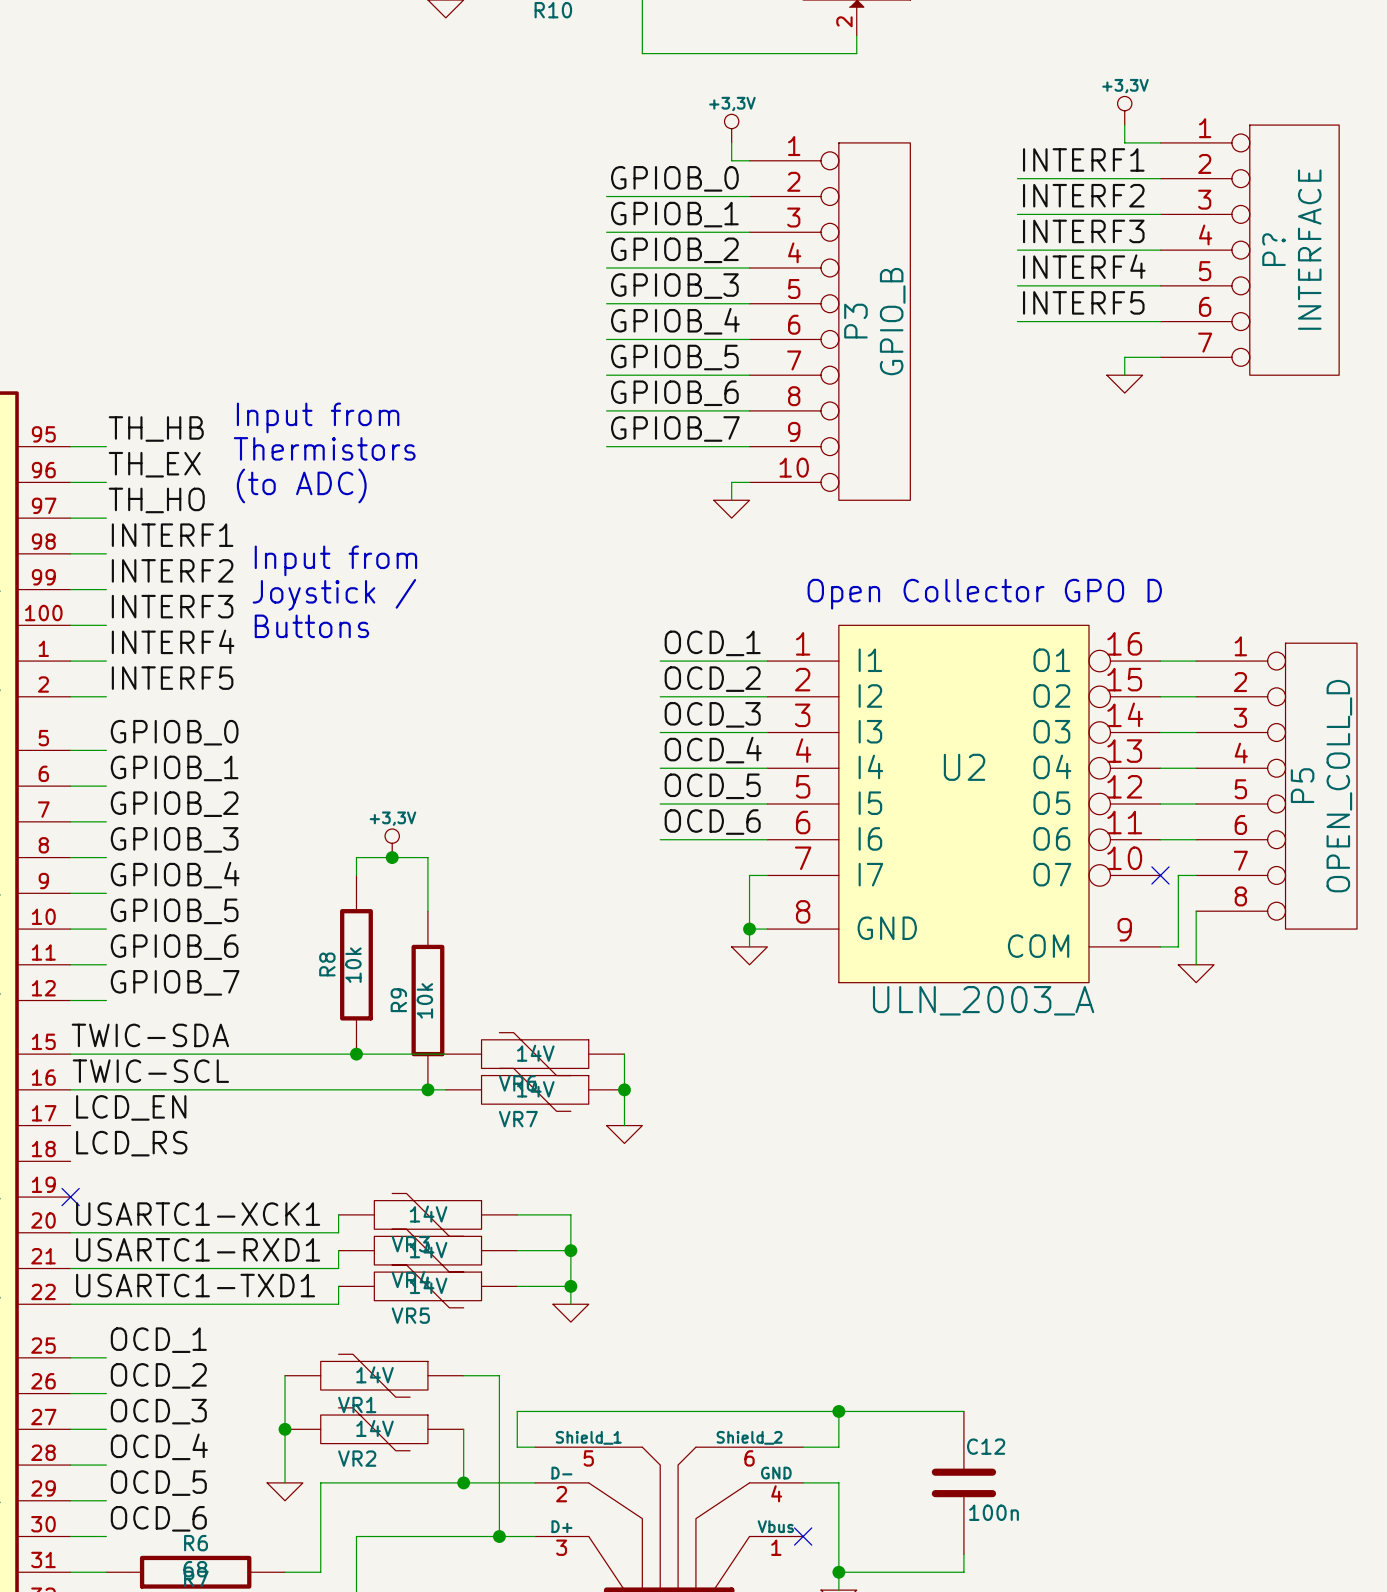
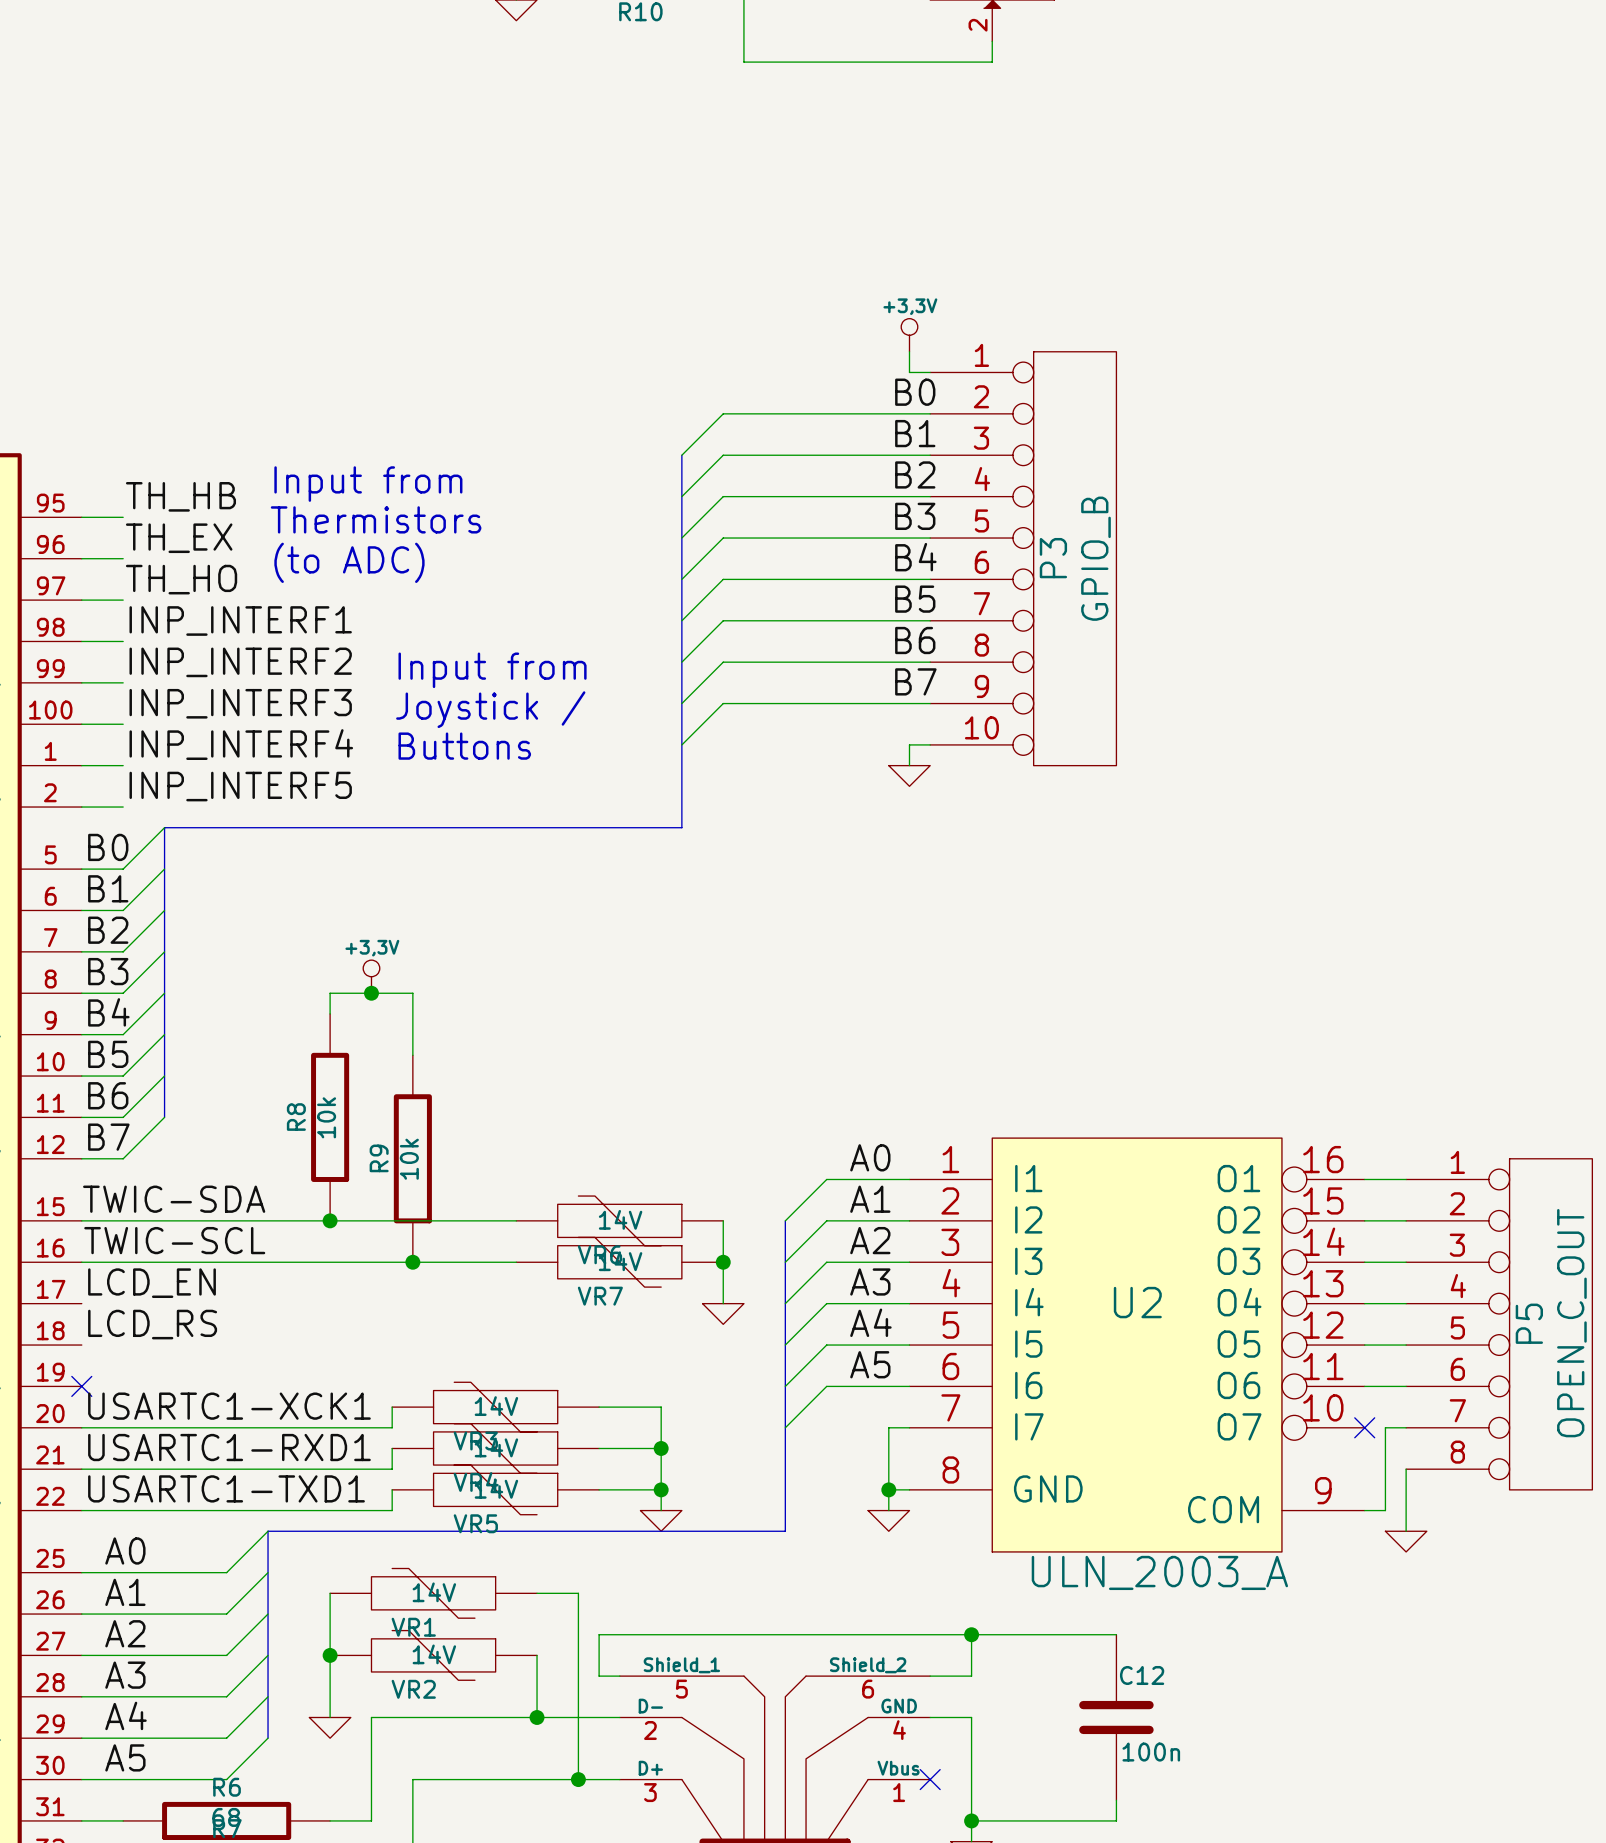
power symbol: +3,3V (1124, 110) -> none
wire: (1124, 125) (1124, 142) (1160, 142) -> none
power symbol position: +3,3V (731, 128) -> +3,3V (909, 335)
wire: (731, 142) (731, 160) (749, 160) -> (909, 351) (909, 372) (930, 372)
label: INTERF1 (1083, 159) -> none
label: GPIOB_0 (674, 178) -> none
wire: (1017, 178) (1160, 178) -> none
label: INTERF2 (1083, 195) -> none
wire: (606, 196) (749, 196) -> none
label: GPIOB_1 (674, 214) -> none
wire: (1017, 214) (1160, 214) -> none
label: INTERF3 (1083, 231) -> none
wire: (606, 232) (749, 232) -> none
label: GPIOB_2 (674, 250) -> none
wire: (1017, 250) (1160, 250) -> none
P?: INTERFACE (1249, 250) -> none
label: INTERF4 (1084, 266) -> none
wire: (606, 268) (749, 268) -> none
wire: (1017, 285) (1160, 285) -> none
label: GPIOB_3 (674, 286) -> none
label: INTERF5 (1083, 302) -> none
wire: (606, 303) (749, 303) -> none
label: GPIOB_4 (675, 321) -> none
P3 position: (829, 321) -> (1023, 558)
wire: (1017, 321) (1160, 321) -> none
label: none -> B0 (915, 392)
wire: (606, 339) (749, 339) -> none
label: GPIOB_5 (674, 357) -> none
wire: none -> (930, 413) (723, 413) (681, 455)
wire: (1160, 357) (1124, 357) (1124, 375) -> none
label: none -> B1 (915, 433)
wire: (606, 375) (749, 375) -> none
power symbol: (1124, 384) -> none
bus: none -> (681, 455) (681, 827) (164, 827) (164, 1117)
label: GPIOB_6 (674, 393) -> none
wire: none -> (930, 455) (723, 455) (681, 496)
wire: (606, 410) (749, 410) -> none
label: none -> B2 (915, 474)
label: GPIOB_7 (675, 428) -> none
wire: none -> (930, 496) (723, 496) (681, 538)
label: none -> B3 (915, 516)
wire: (606, 446) (749, 446) -> none
wire: none -> (930, 538) (723, 538) (681, 579)
label: none -> B4 (915, 557)
wire: (749, 482) (731, 482) (731, 500) -> (930, 744) (909, 744) (909, 765)
wire: none -> (930, 579) (723, 579) (681, 620)
power symbol: (731, 509) -> none
label: none -> B5 (915, 599)
label: INTERF1 (172, 535) -> INP_INTERF1 (240, 620)
wire: none -> (930, 620) (723, 620) (681, 662)
label: none -> B6 (915, 640)
text position: Input from (335, 560) -> Input from (492, 670)
label: INTERF2 (172, 570) -> INP_INTERF2 (240, 662)
wire: none -> (930, 662) (723, 662) (681, 703)
label: none -> B7 (915, 681)
text position: Joystick / (334, 594) -> Joystick / (490, 709)
text: Open Collector GPO D (984, 594) -> none
label: INTERF3 (172, 606) -> INP_INTERF3 (240, 703)
wire: none -> (930, 703) (723, 703) (681, 744)
text position: Buttons (311, 626) -> Buttons (464, 746)
label: INTERF4 (173, 641) -> INP_INTERF4 (241, 744)
label: OCD_1 (712, 643) -> none
wire: (660, 661) (767, 661) -> none
wire: (1160, 661) (1196, 661) -> none
power symbol: none -> (909, 775)
label: INTERF5 (172, 678) -> INP_INTERF5 (240, 786)
label: OCD_2 (712, 679) -> none
wire: (660, 696) (767, 696) -> none
wire: (1160, 696) (1196, 696) -> (1364, 1179) (1406, 1179)
wire: none -> (164, 827) (123, 869)
label: OCD_3 (712, 714) -> none
label: none -> B0 (108, 847)
label: GPIOB_0 (174, 732) -> none
wire: (660, 732) (767, 732) -> none
wire: (1160, 732) (1196, 732) -> (1364, 1220) (1406, 1220)
wire: none -> (164, 869) (123, 910)
label: OCD_4 (713, 750) -> none
label: none -> B1 (108, 888)
label: GPIOB_1 (174, 768) -> none
wire: (660, 768) (767, 768) -> none
wire: (1160, 768) (1196, 768) -> (1364, 1262) (1406, 1262)
wire: none -> (164, 910) (123, 951)
label: OCD_5 (712, 786) -> none
P5 position: (1276, 786) -> (1499, 1324)
P5 value: OPEN_COLL_D (1339, 786) -> OPEN_C_OUT (1571, 1323)
label: none -> B2 (108, 930)
wire: (660, 803) (767, 803) -> none
U2 position: (963, 803) -> (1137, 1345)
wire: (1160, 803) (1196, 803) -> (1364, 1303) (1406, 1303)
label: GPIOB_2 (174, 804) -> none
wire: none -> (164, 951) (123, 993)
label: OCD_6 (712, 822) -> none
label: none -> B3 (108, 971)
label: GPIOB_3 (174, 839) -> none
wire: (660, 839) (767, 839) -> none
wire: (1160, 839) (1196, 839) -> (1364, 1345) (1406, 1345)
power symbol position: +3,3V (392, 843) -> +3,3V (371, 976)
wire: none -> (164, 993) (123, 1034)
wire: (356, 857) (427, 857) (427, 911) -> (412, 993) (330, 993) (330, 1013)
junction position: (392, 857) -> (371, 993)
label: none -> B4 (108, 1012)
label: GPIOB_4 (175, 875) -> none
wire: (767, 875) (749, 875) (749, 946) -> none
no-connect mark: (1160, 875) -> none
wire: (1196, 875) (1178, 875) (1178, 946) (1160, 946) -> none
wire: none -> (164, 1034) (123, 1076)
label: none -> B5 (108, 1054)
label: GPIOB_5 (174, 911) -> none
wire: (1196, 911) (1196, 964) -> none
wire: none -> (164, 1076) (123, 1117)
wire: (749, 929) (767, 929) -> none
junction: (749, 929) -> none
label: none -> B6 (108, 1095)
label: GPIOB_6 (174, 947) -> none
power symbol: (749, 955) -> none
wire: none -> (164, 1117) (123, 1158)
R8 position: (356, 964) -> (330, 1117)
power symbol: (1196, 973) -> none
label: none -> B7 (108, 1137)
label: GPIOB_7 (175, 982) -> none
label: none -> A0 (870, 1157)
R9 position: (427, 1000) -> (412, 1158)
wire: none -> (909, 1179) (826, 1179) (785, 1220)
label: none -> A1 (870, 1199)
junction: none -> (330, 1220)
junction: (356, 1054) -> none
bus: none -> (785, 1220) (785, 1531) (268, 1531) (268, 1738)
wire: none -> (909, 1220) (826, 1220) (785, 1262)
label: none -> A2 (870, 1240)
junction: none -> (412, 1262)
junction: (427, 1089) -> none
wire: none -> (909, 1262) (826, 1262) (785, 1303)
label: none -> A3 (870, 1281)
wire: none -> (909, 1303) (826, 1303) (785, 1345)
label: none -> A4 (870, 1322)
wire: none -> (909, 1345) (826, 1345) (785, 1386)
label: none -> A5 (870, 1364)
wire: none -> (909, 1386) (826, 1386) (785, 1427)
wire: none -> (1364, 1386) (1406, 1386)
wire: none -> (909, 1427) (888, 1427) (888, 1510)
no-connect mark: none -> (1364, 1427)
wire: none -> (1406, 1427) (1385, 1427) (1385, 1510) (1364, 1510)
wire: none -> (1406, 1469) (1406, 1531)
wire: none -> (888, 1489) (909, 1489)
junction: none -> (888, 1489)
power symbol: none -> (888, 1520)
wire: none -> (268, 1531) (226, 1572) (123, 1572)
power symbol: none -> (1406, 1541)
label: none -> A0 (125, 1550)
label: OCD_1 (158, 1340) -> none
wire: none -> (268, 1572) (226, 1614) (123, 1614)
label: none -> A1 (125, 1592)
label: OCD_2 (158, 1375) -> none
wire: none -> (268, 1614) (226, 1655) (123, 1655)
label: none -> A2 (125, 1633)
label: OCD_3 (158, 1411) -> none
wire: none -> (268, 1655) (226, 1696) (123, 1696)
label: none -> A3 (125, 1675)
label: OCD_4 (159, 1446) -> none
wire: none -> (268, 1696) (226, 1738) (123, 1738)
label: none -> A4 (125, 1715)
label: OCD_5 (158, 1483) -> none
wire: none -> (268, 1738) (226, 1779) (123, 1779)
label: none -> A5 (125, 1757)
label: OCD_6 (158, 1518) -> none

